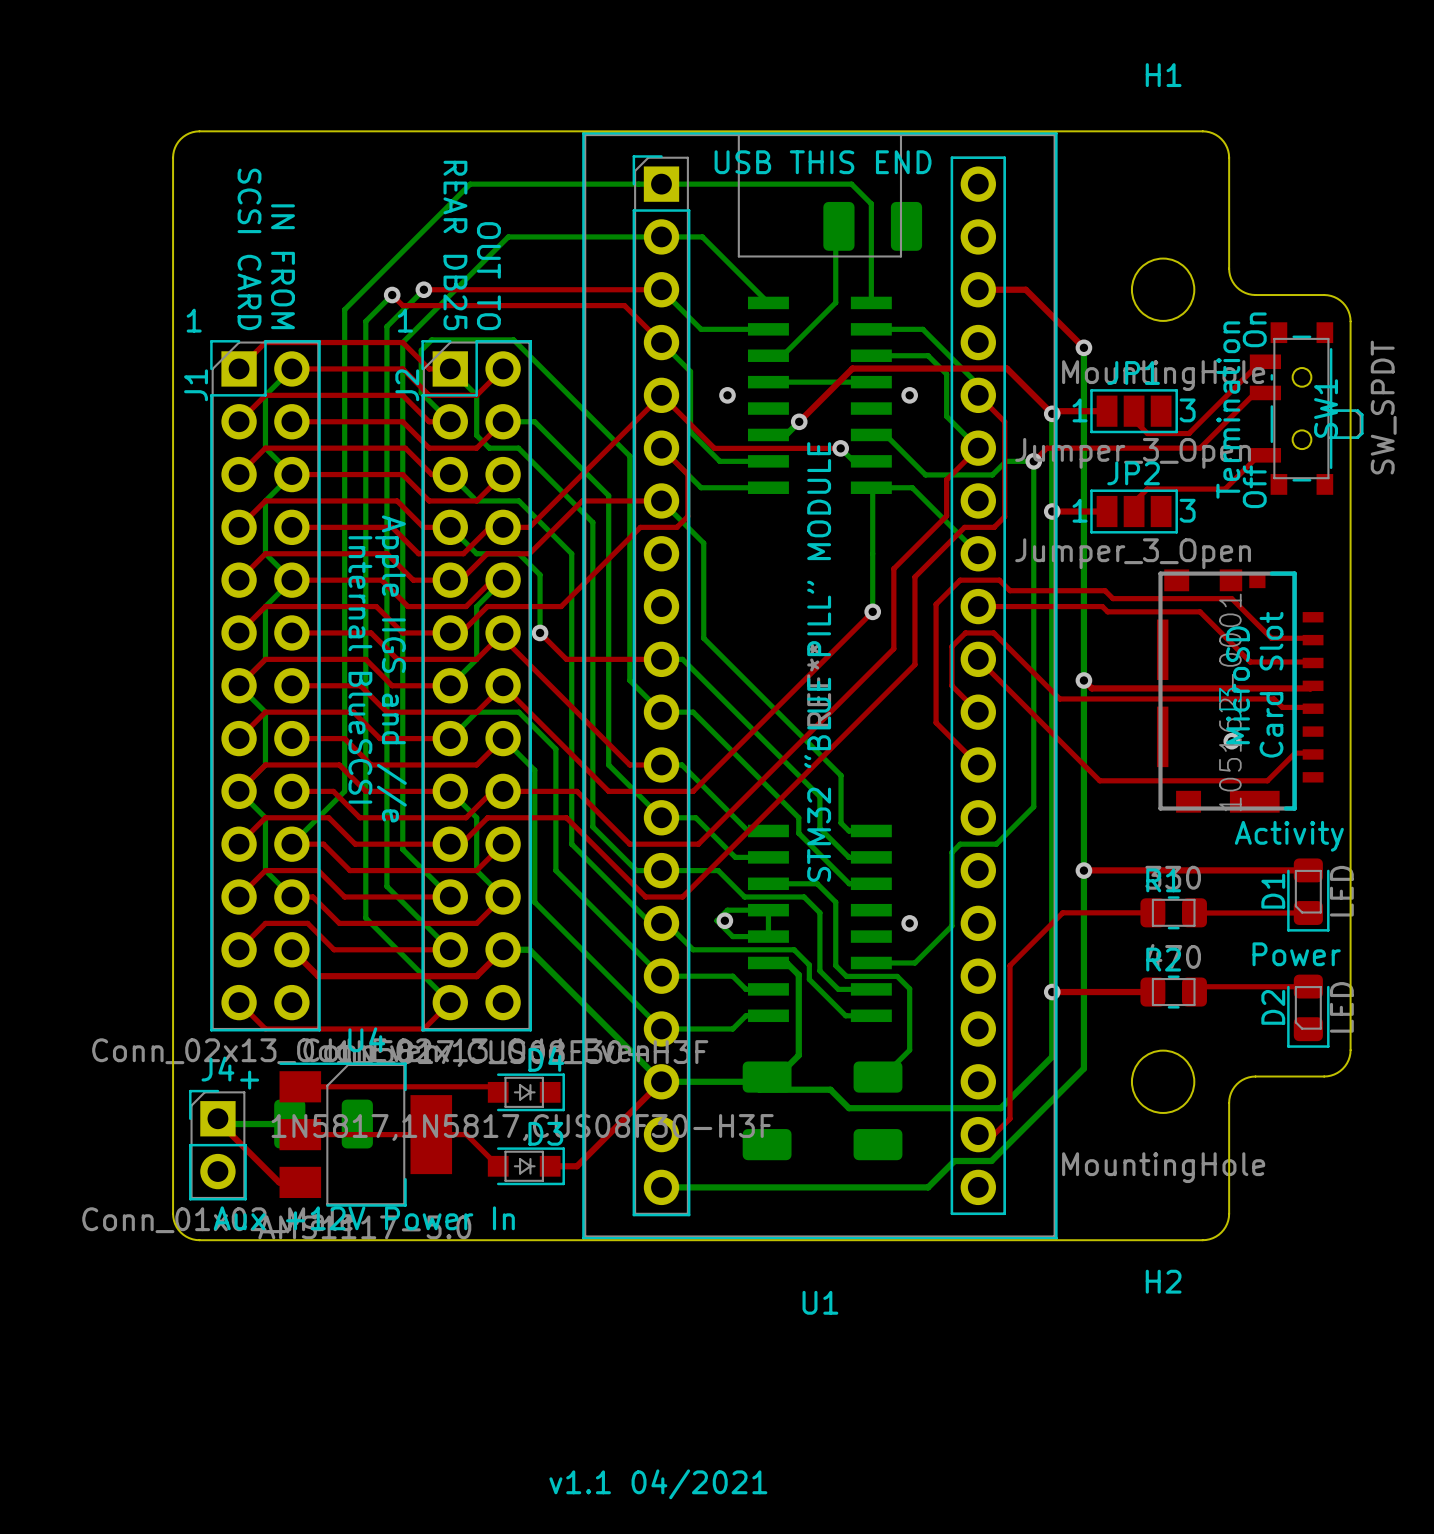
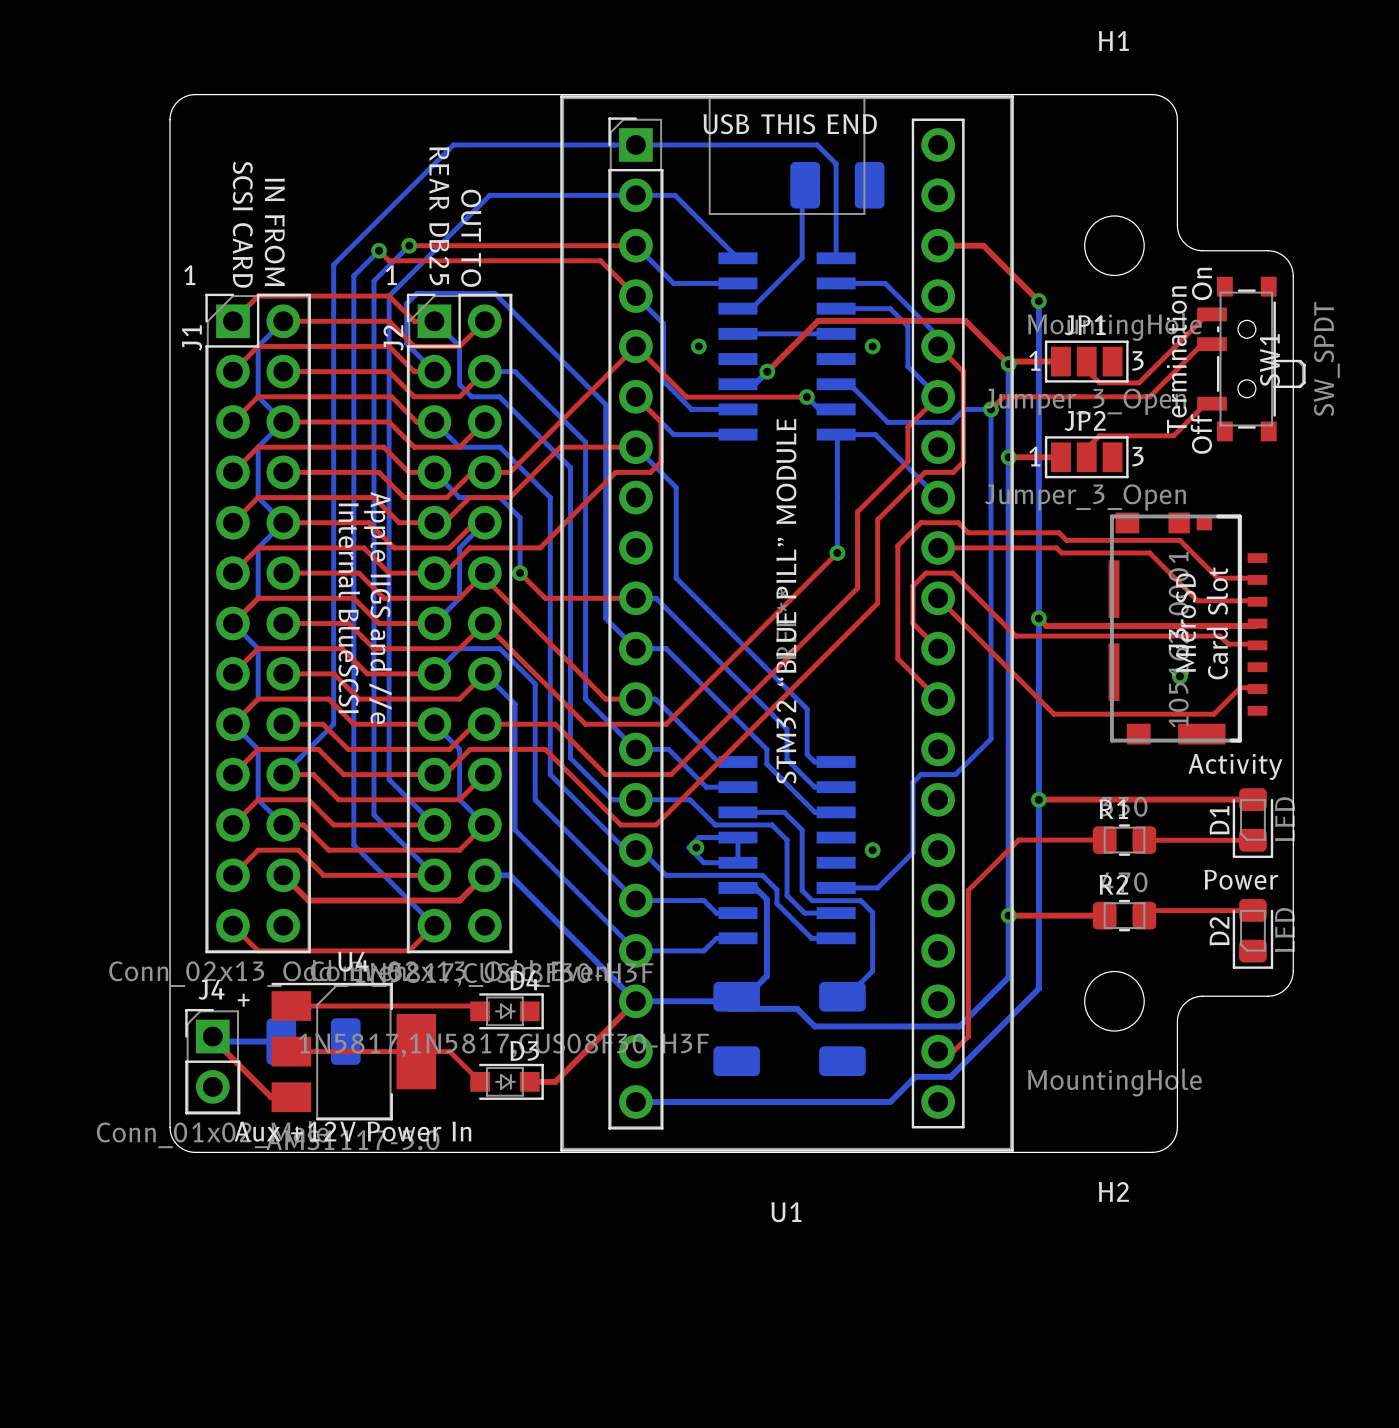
text: v1.1 04/2021 (658, 1484) -> none

